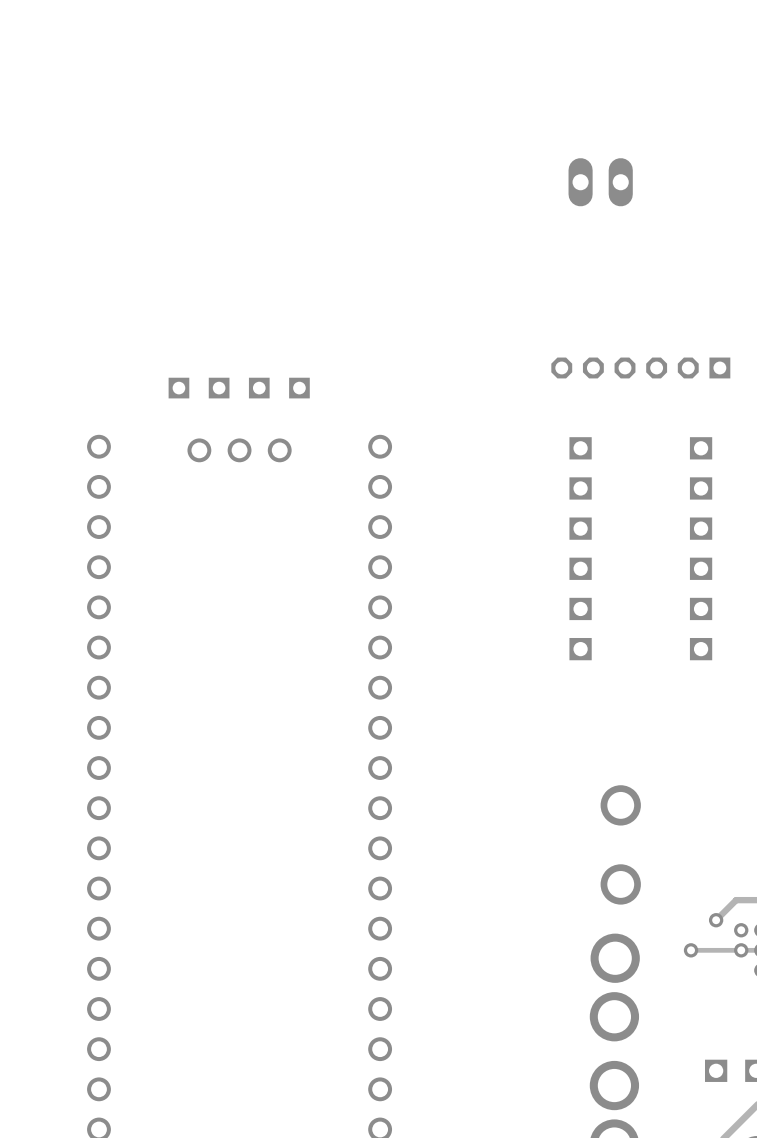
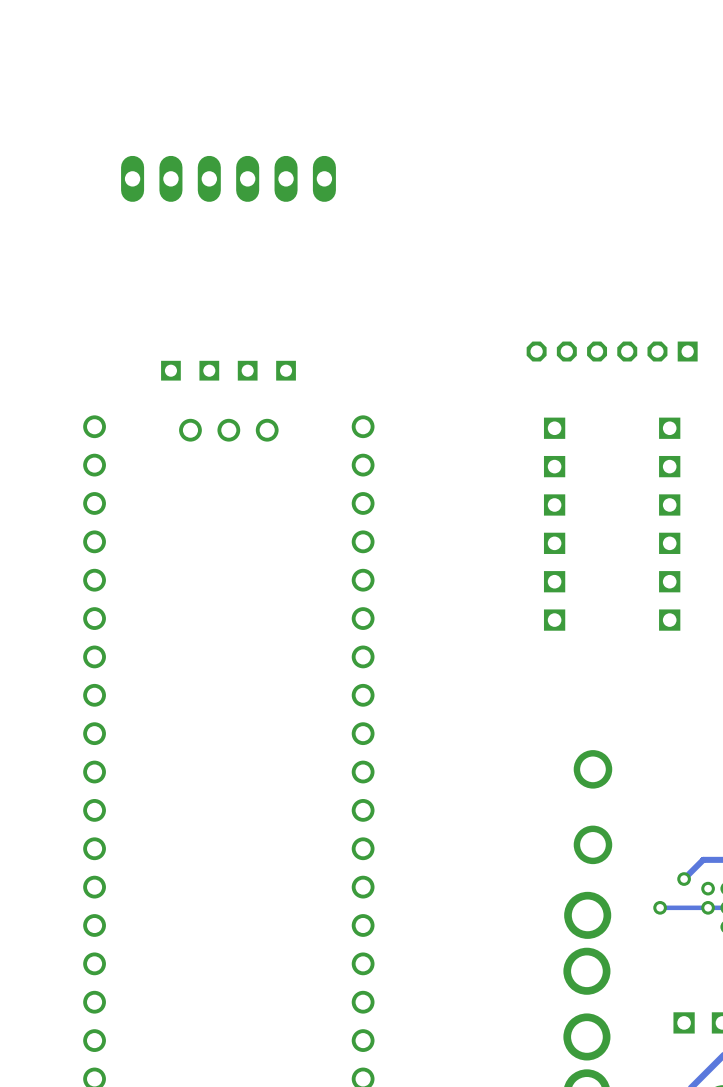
part: (600, 182) -> none
part: none -> (228, 178)

